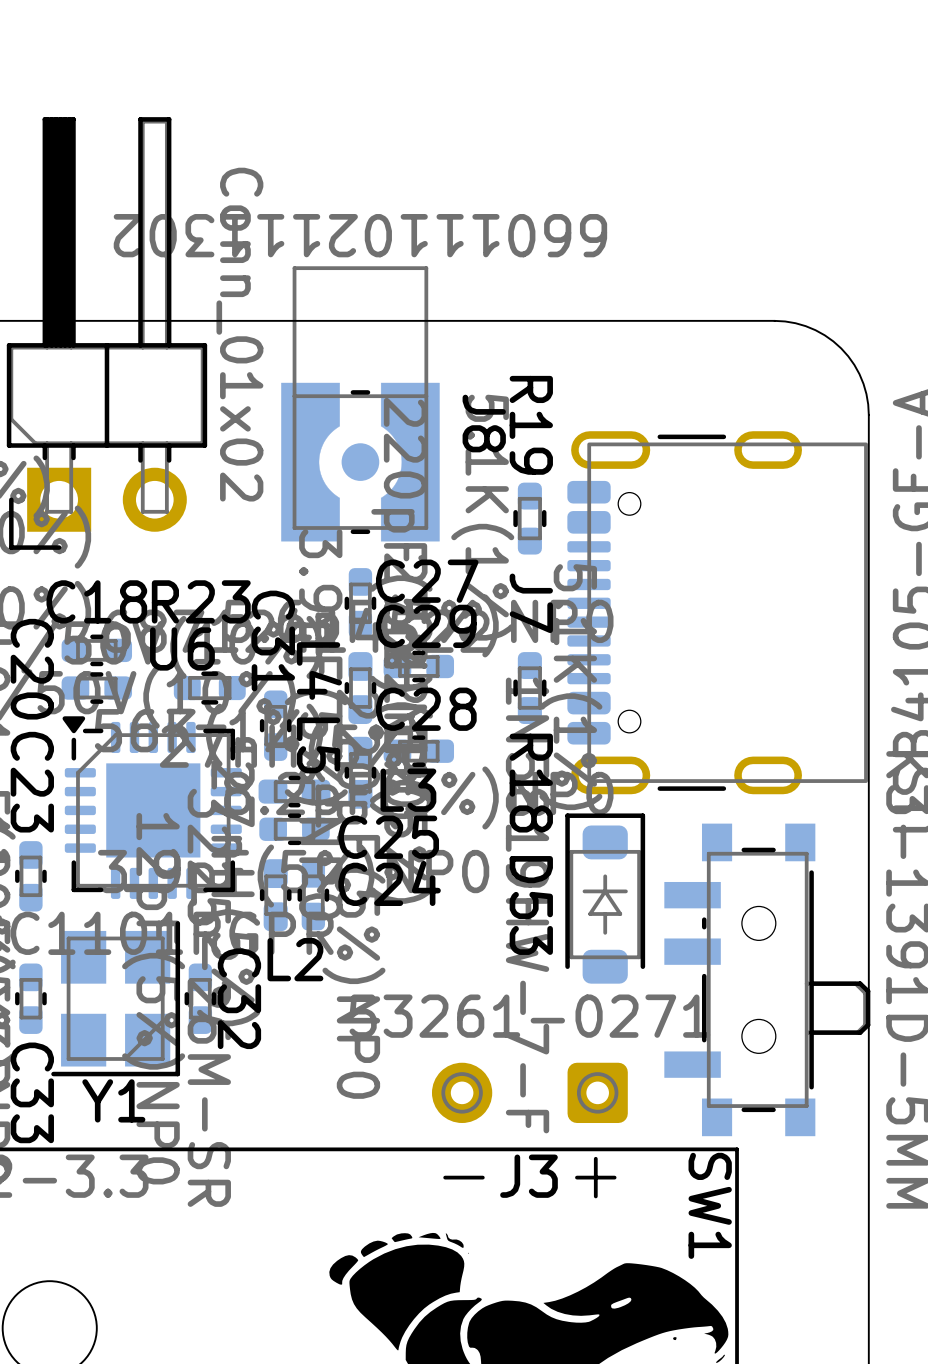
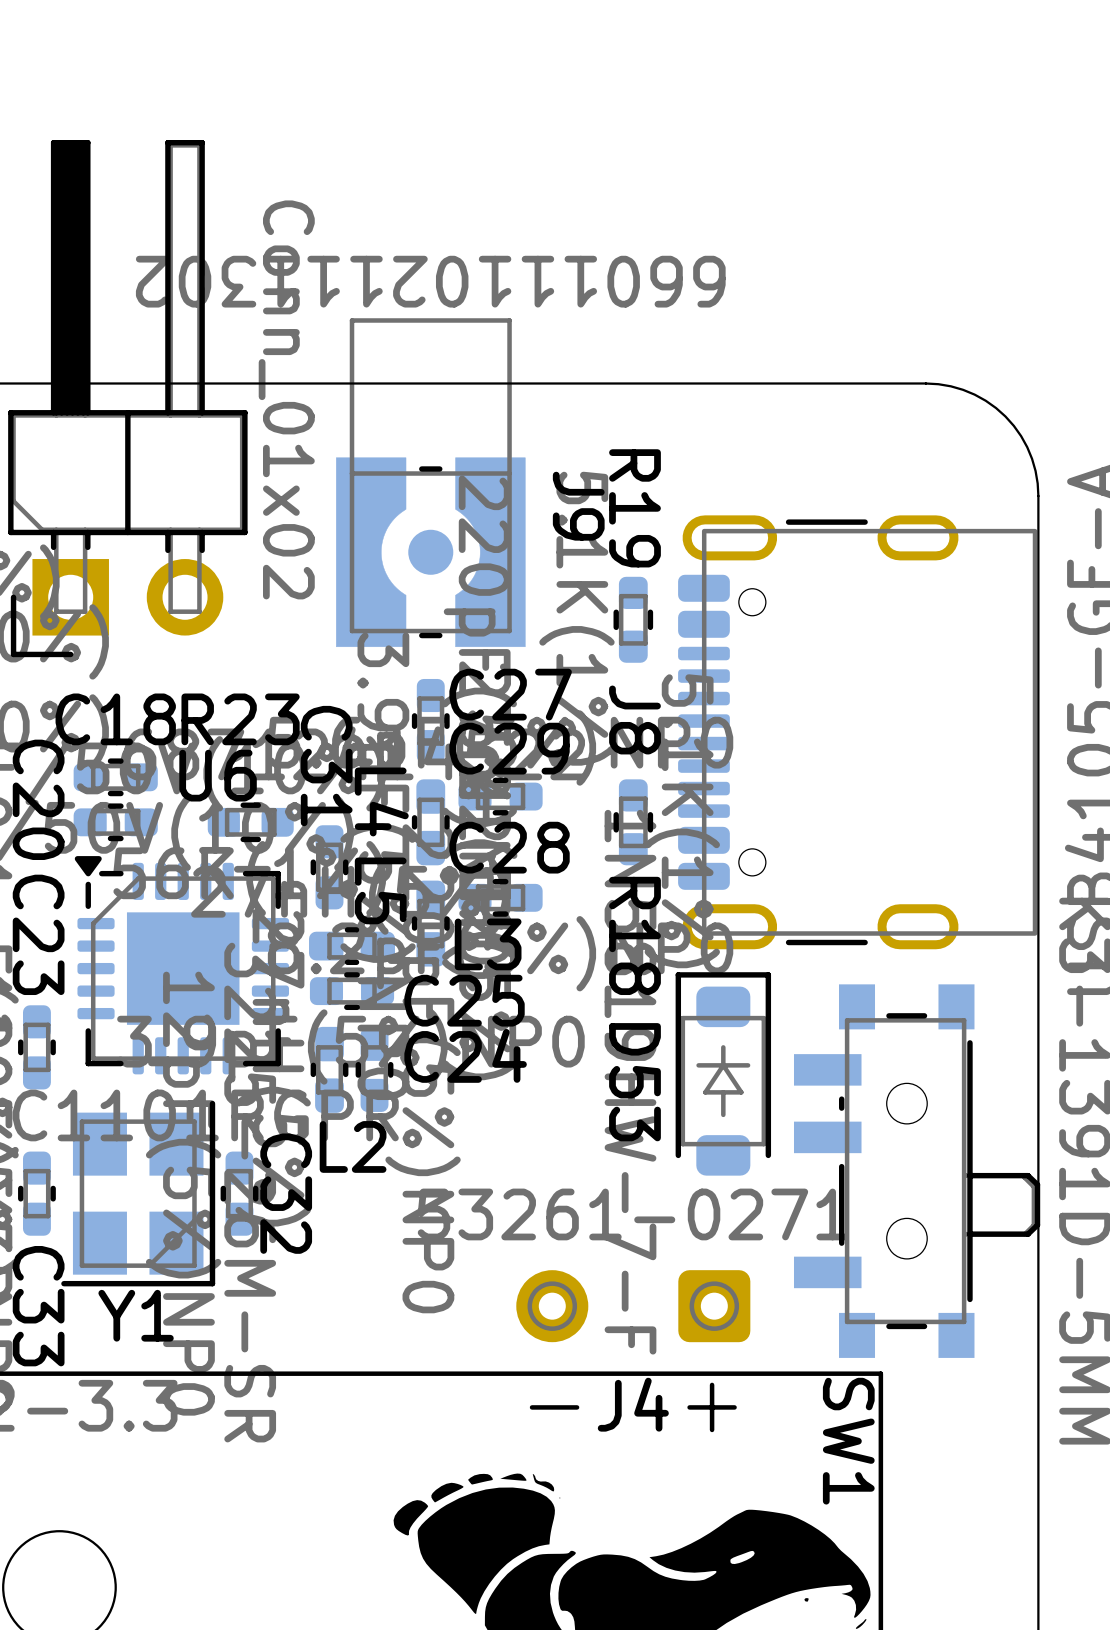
J8 name: J8 (484, 423) -> J9 (578, 506)
J7 name: J7 (531, 603) -> J8 (634, 719)
J3 name: J3 (528, 1176) -> J4 (633, 1404)

